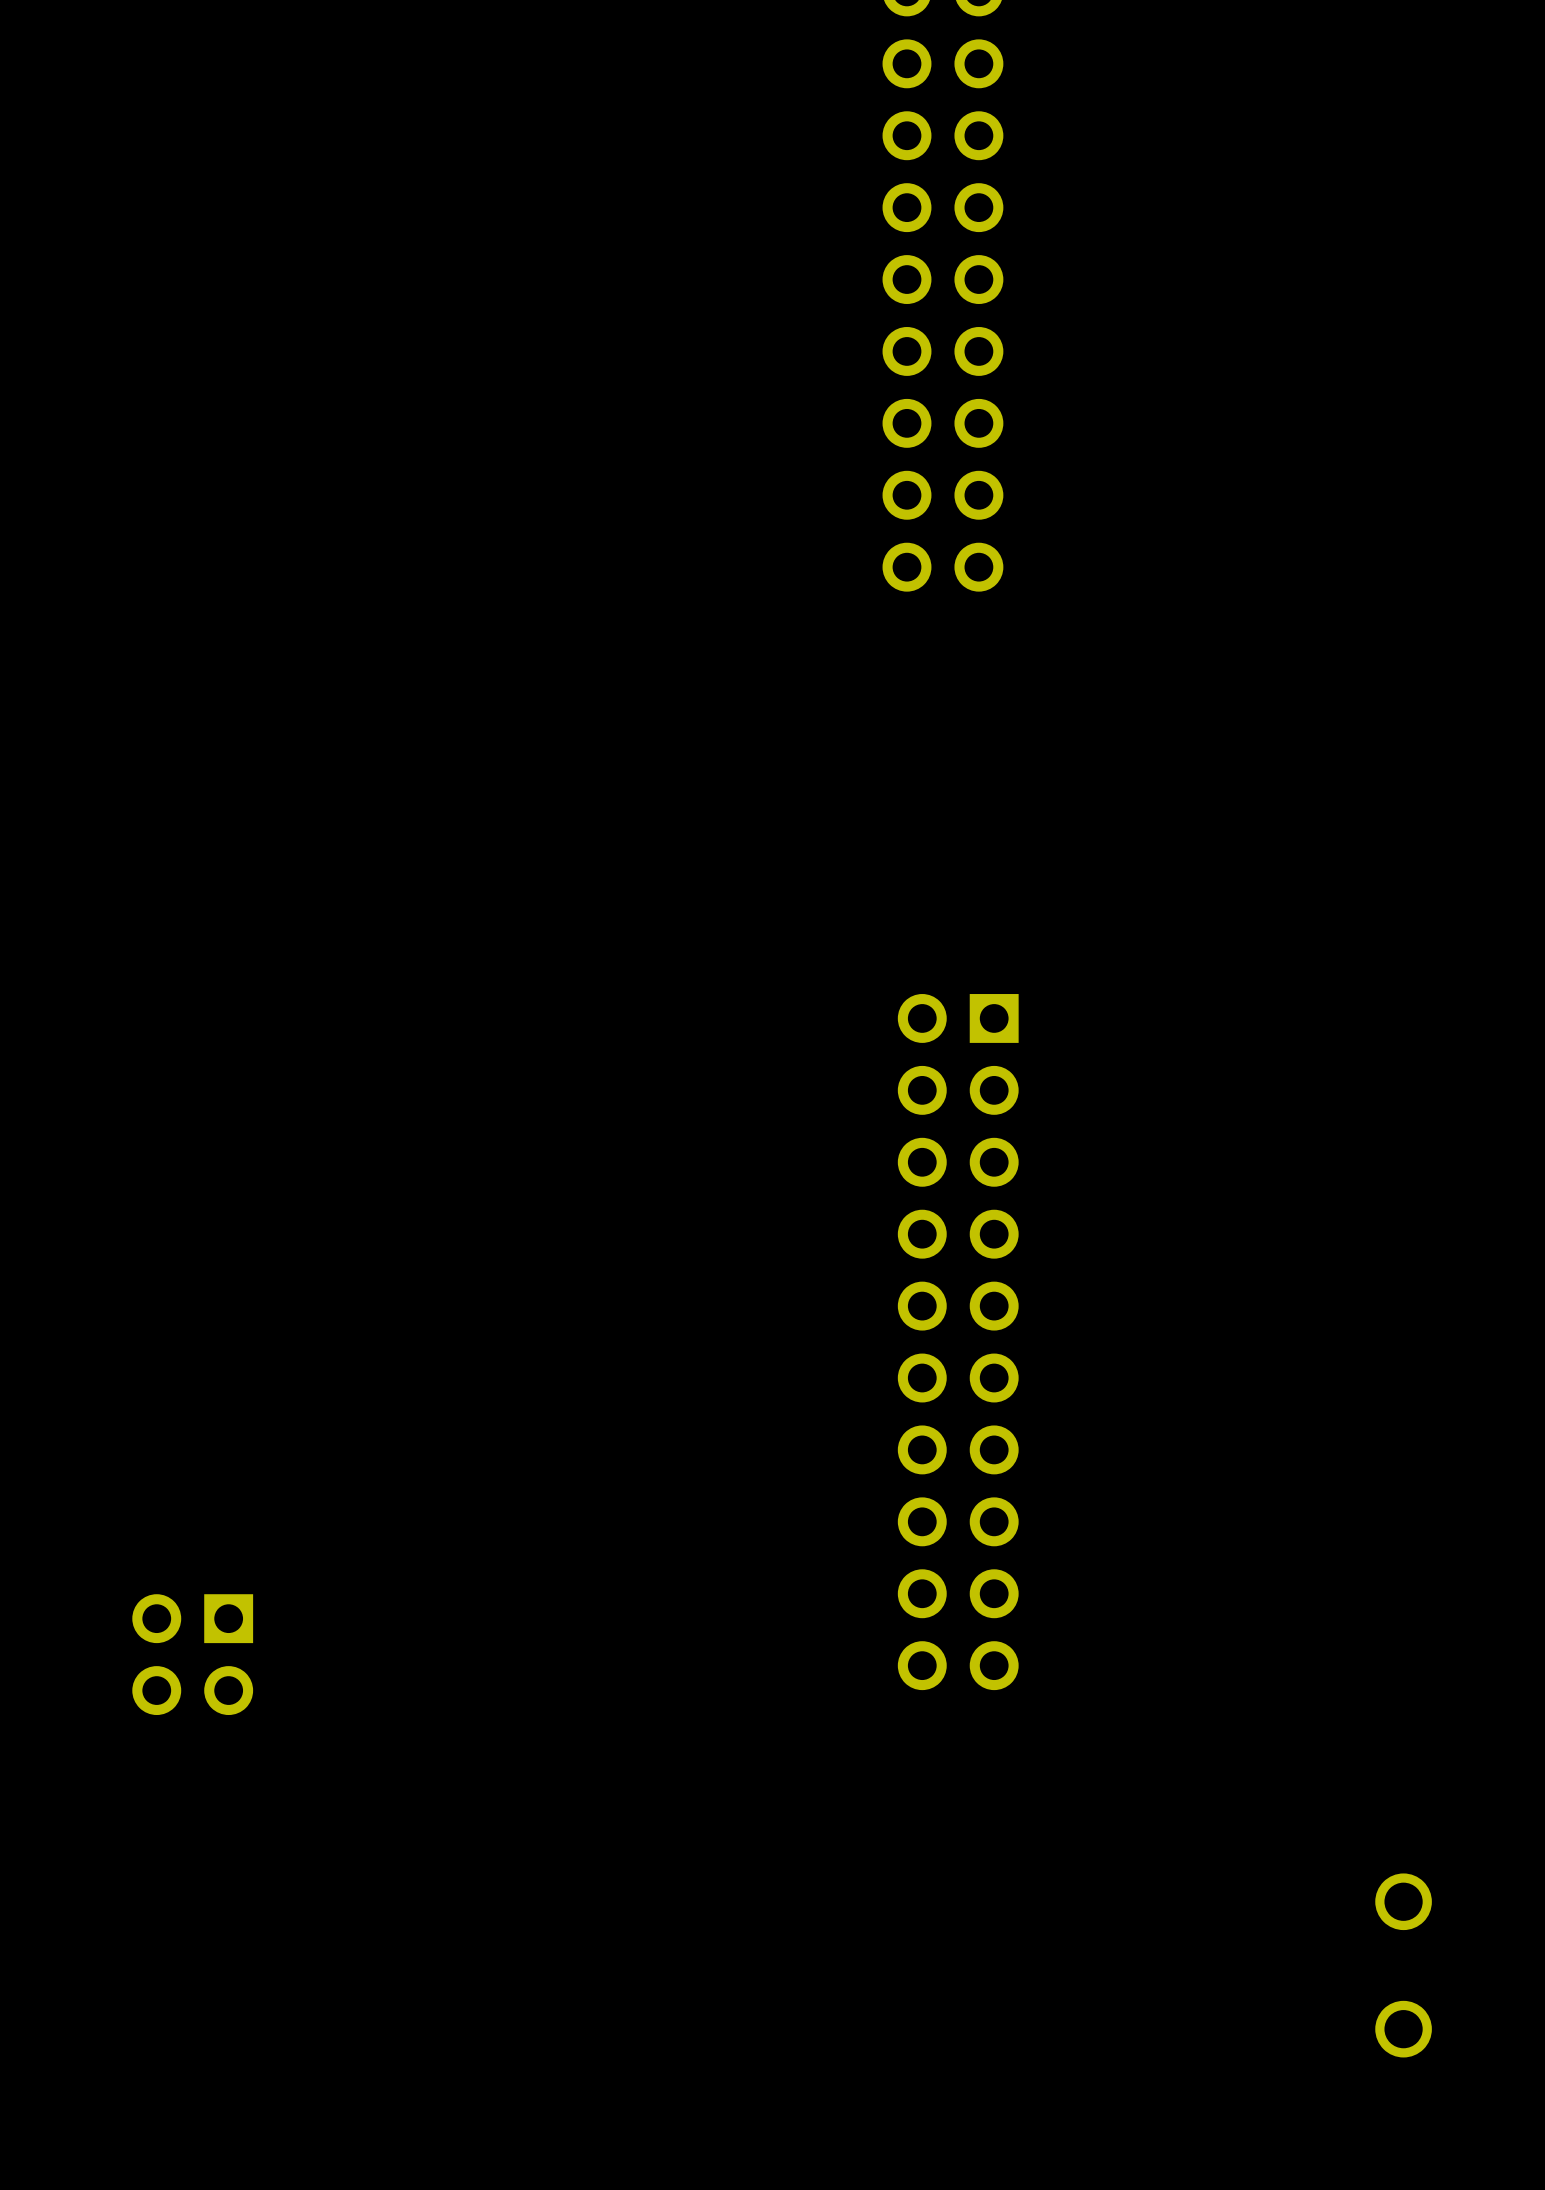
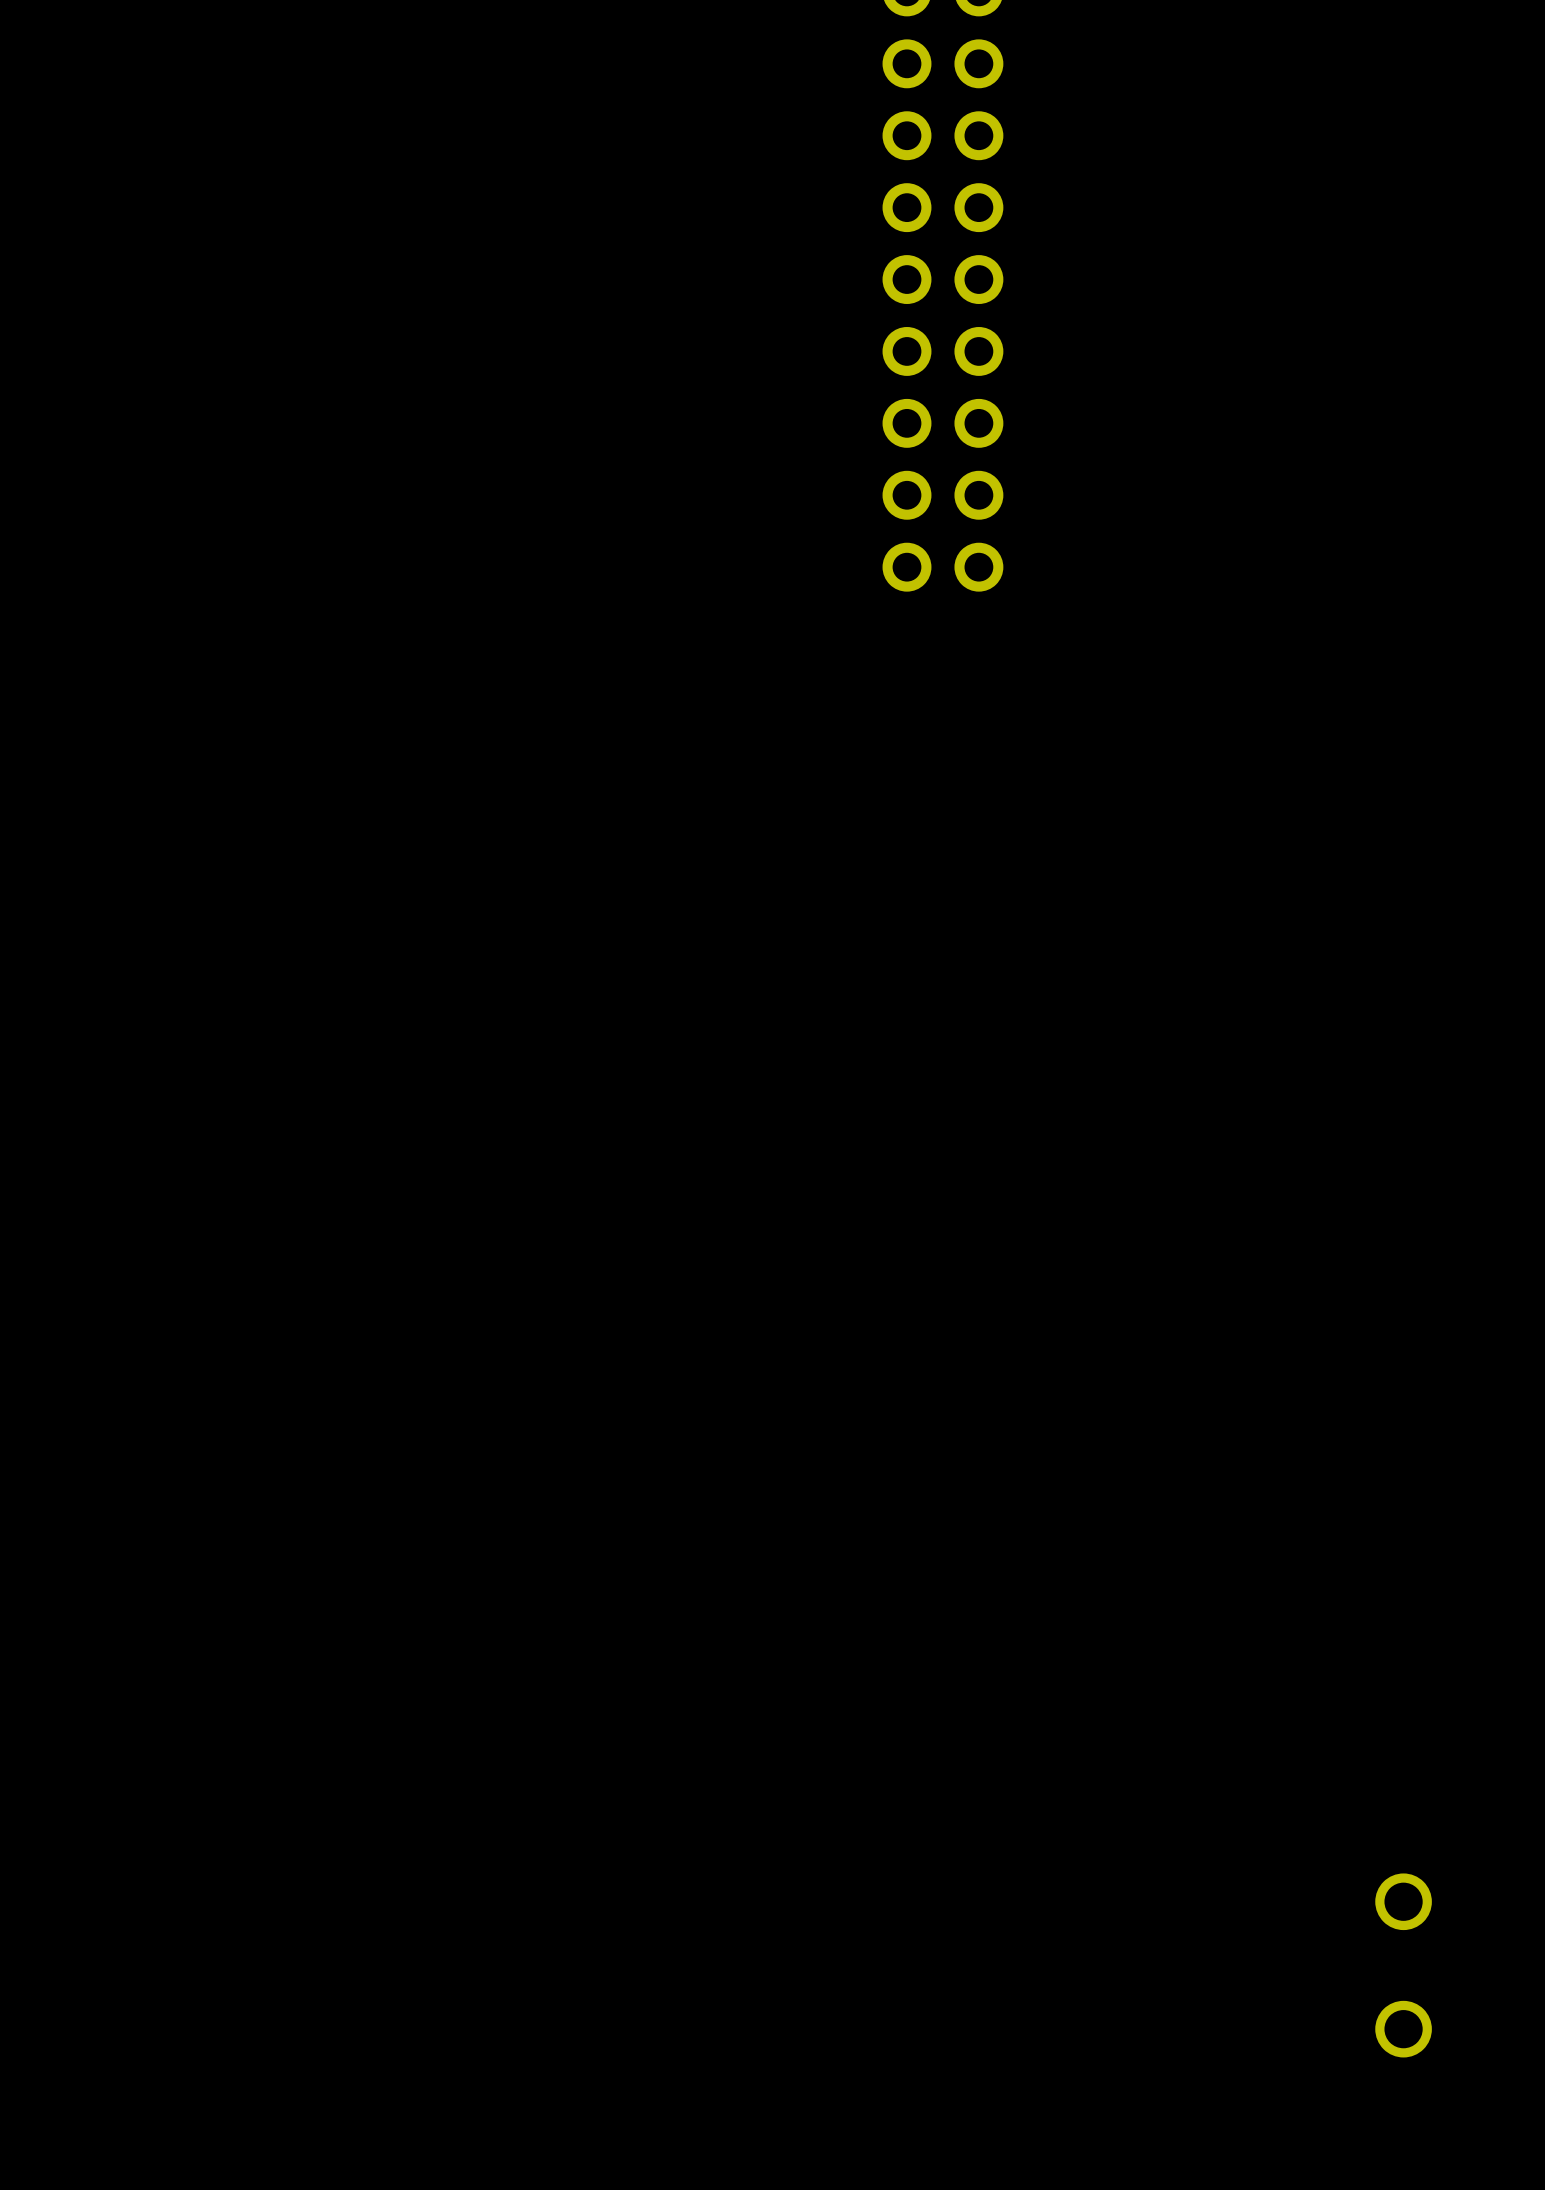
part: (958, 1342) -> none
part: (192, 1654) -> none

